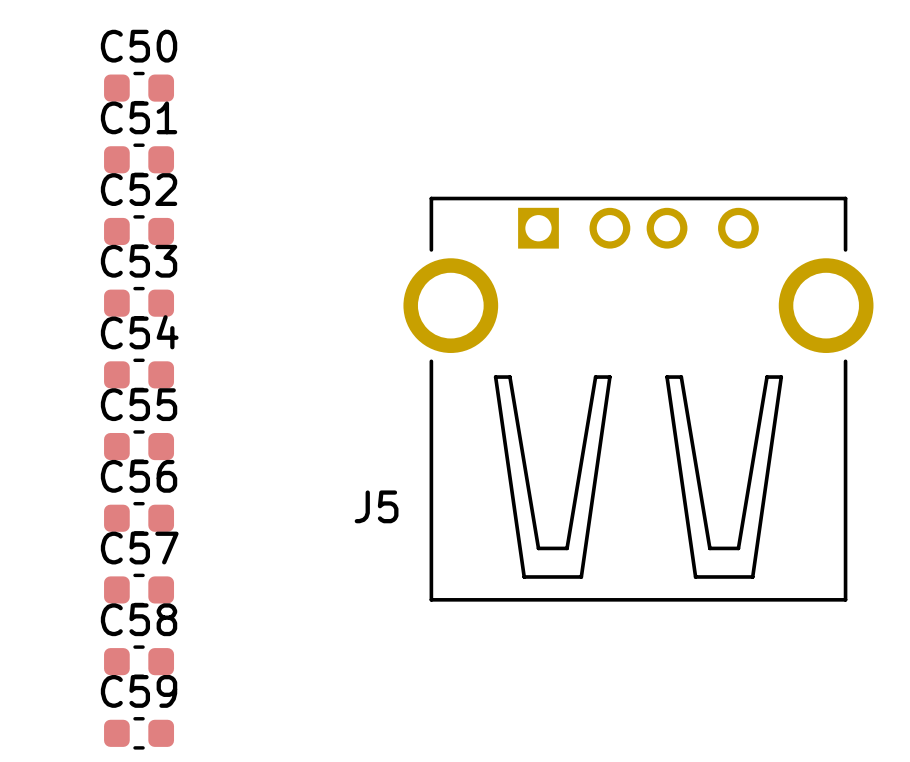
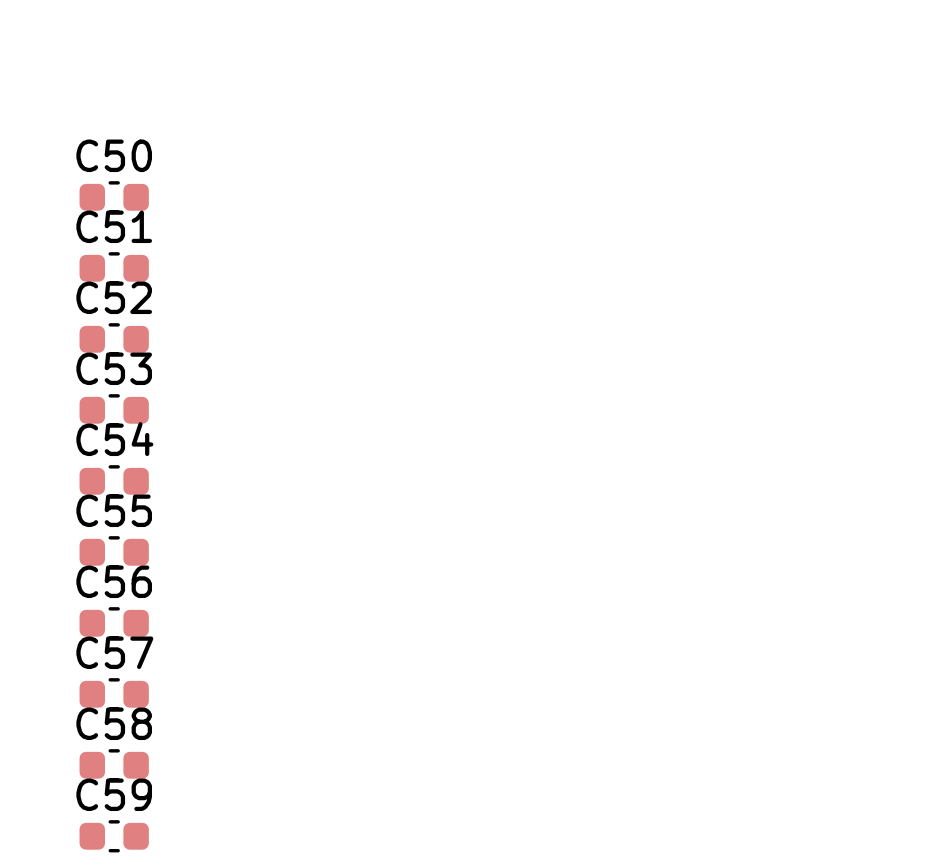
J5: (638, 399) -> none

